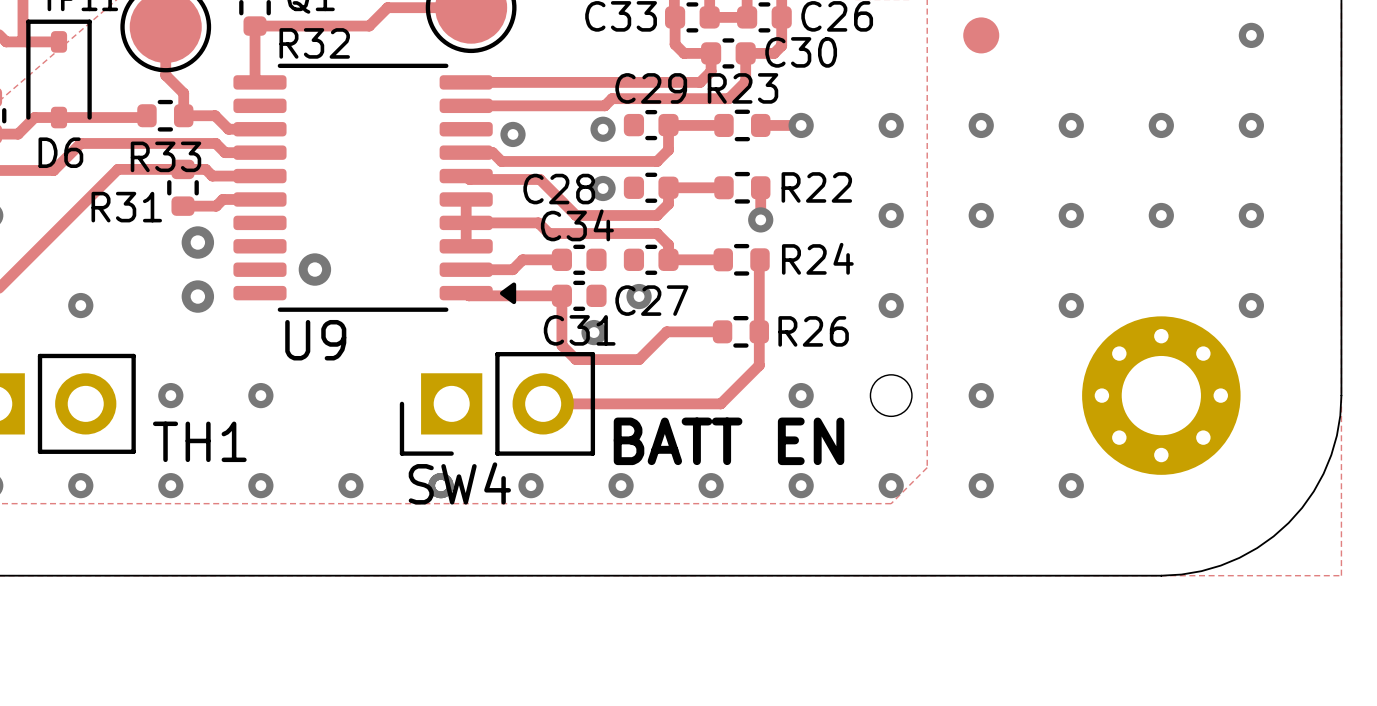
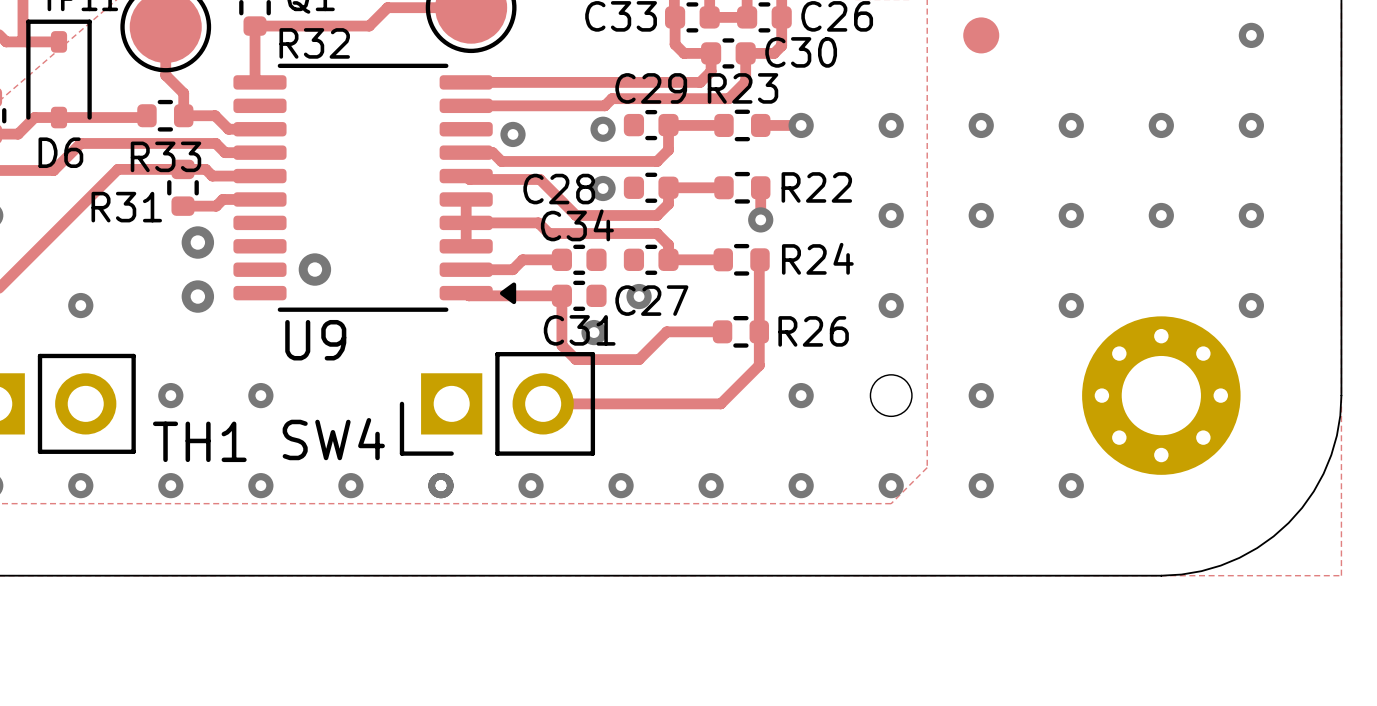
text: BATT EN (729, 441) -> none
SW4 name position: SW4 (459, 483) -> SW4 (333, 439)

